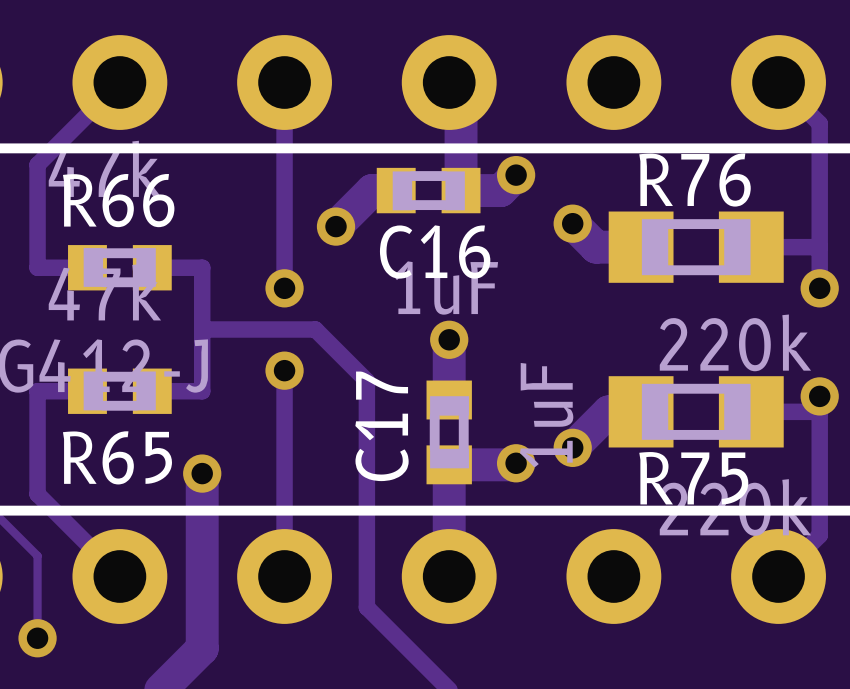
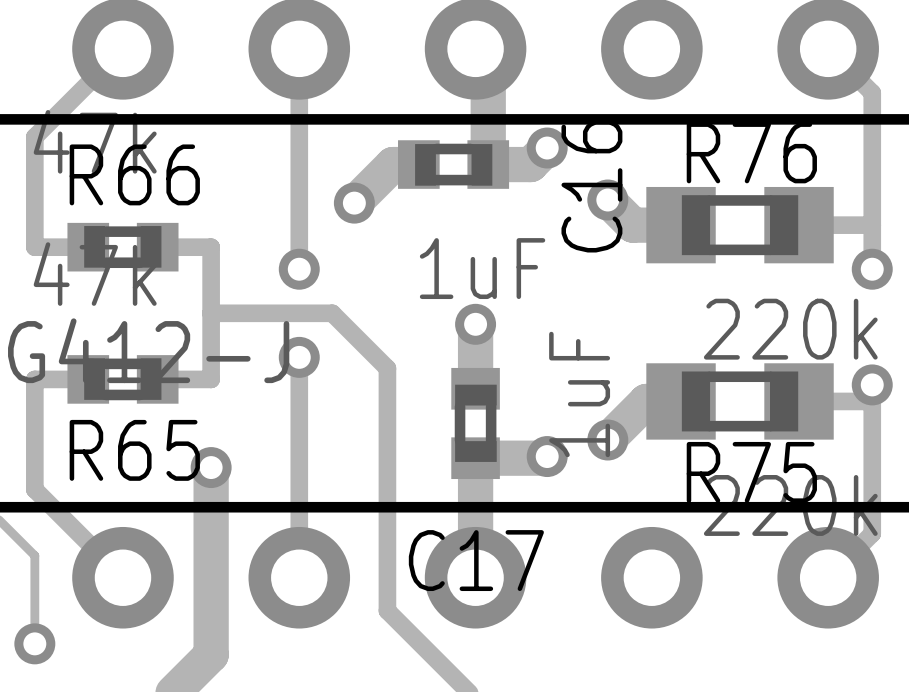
C16 name rotation: 0° (435, 251) -> 90° counterclockwise (591, 186)
C17 name rotation: 0° (381, 426) -> 90° clockwise (476, 560)
C17 name position: C17 (381, 426) -> C17 (476, 560)

